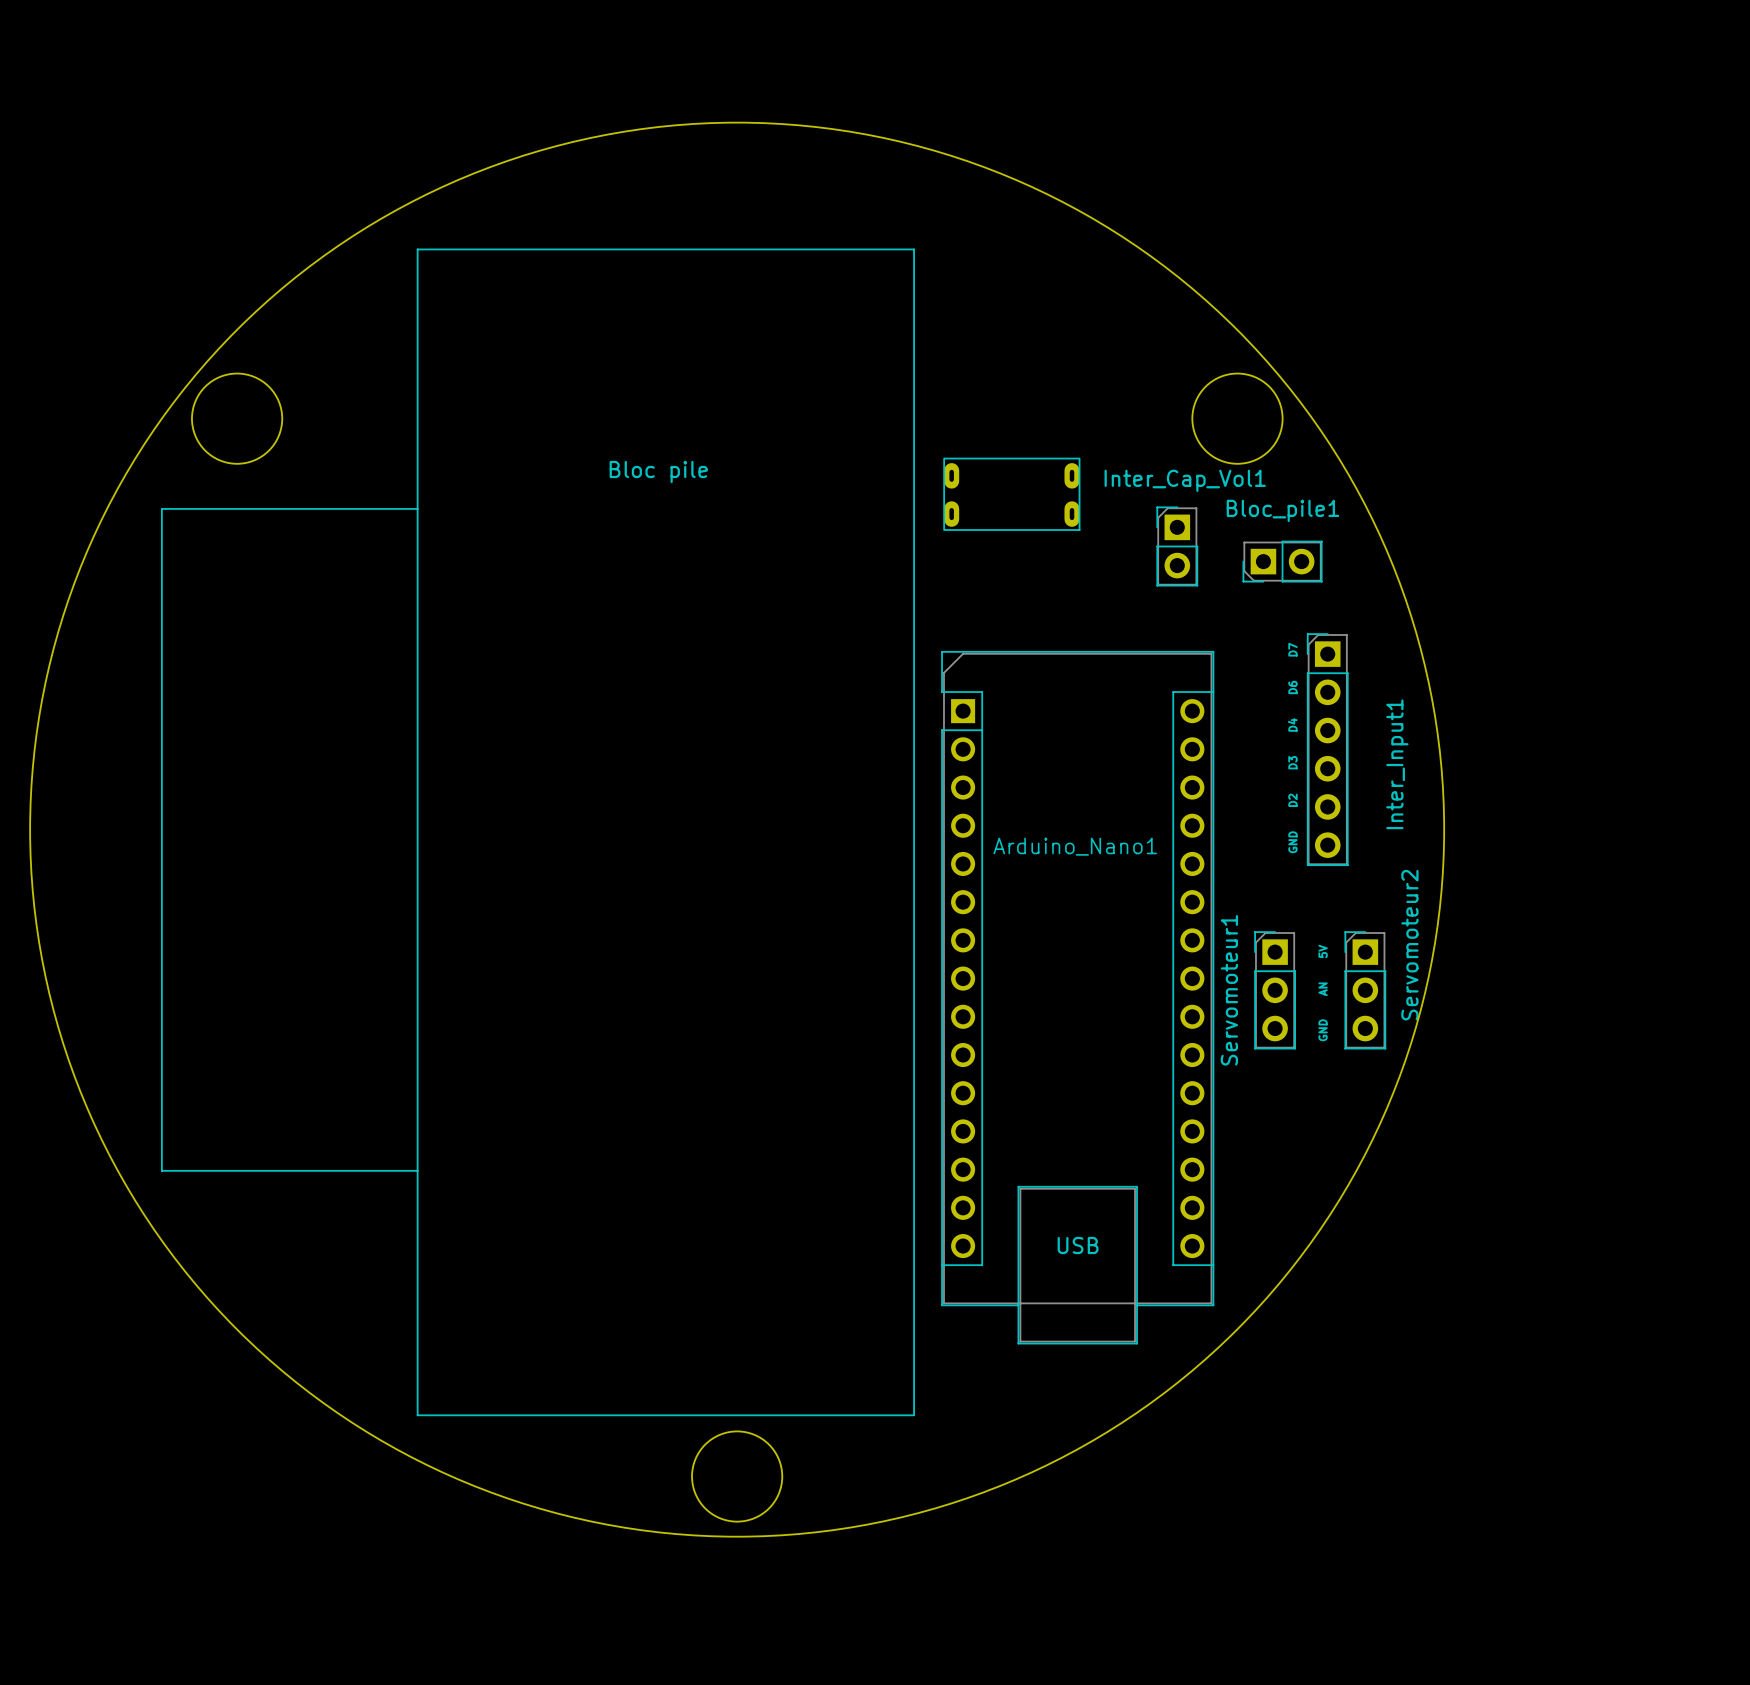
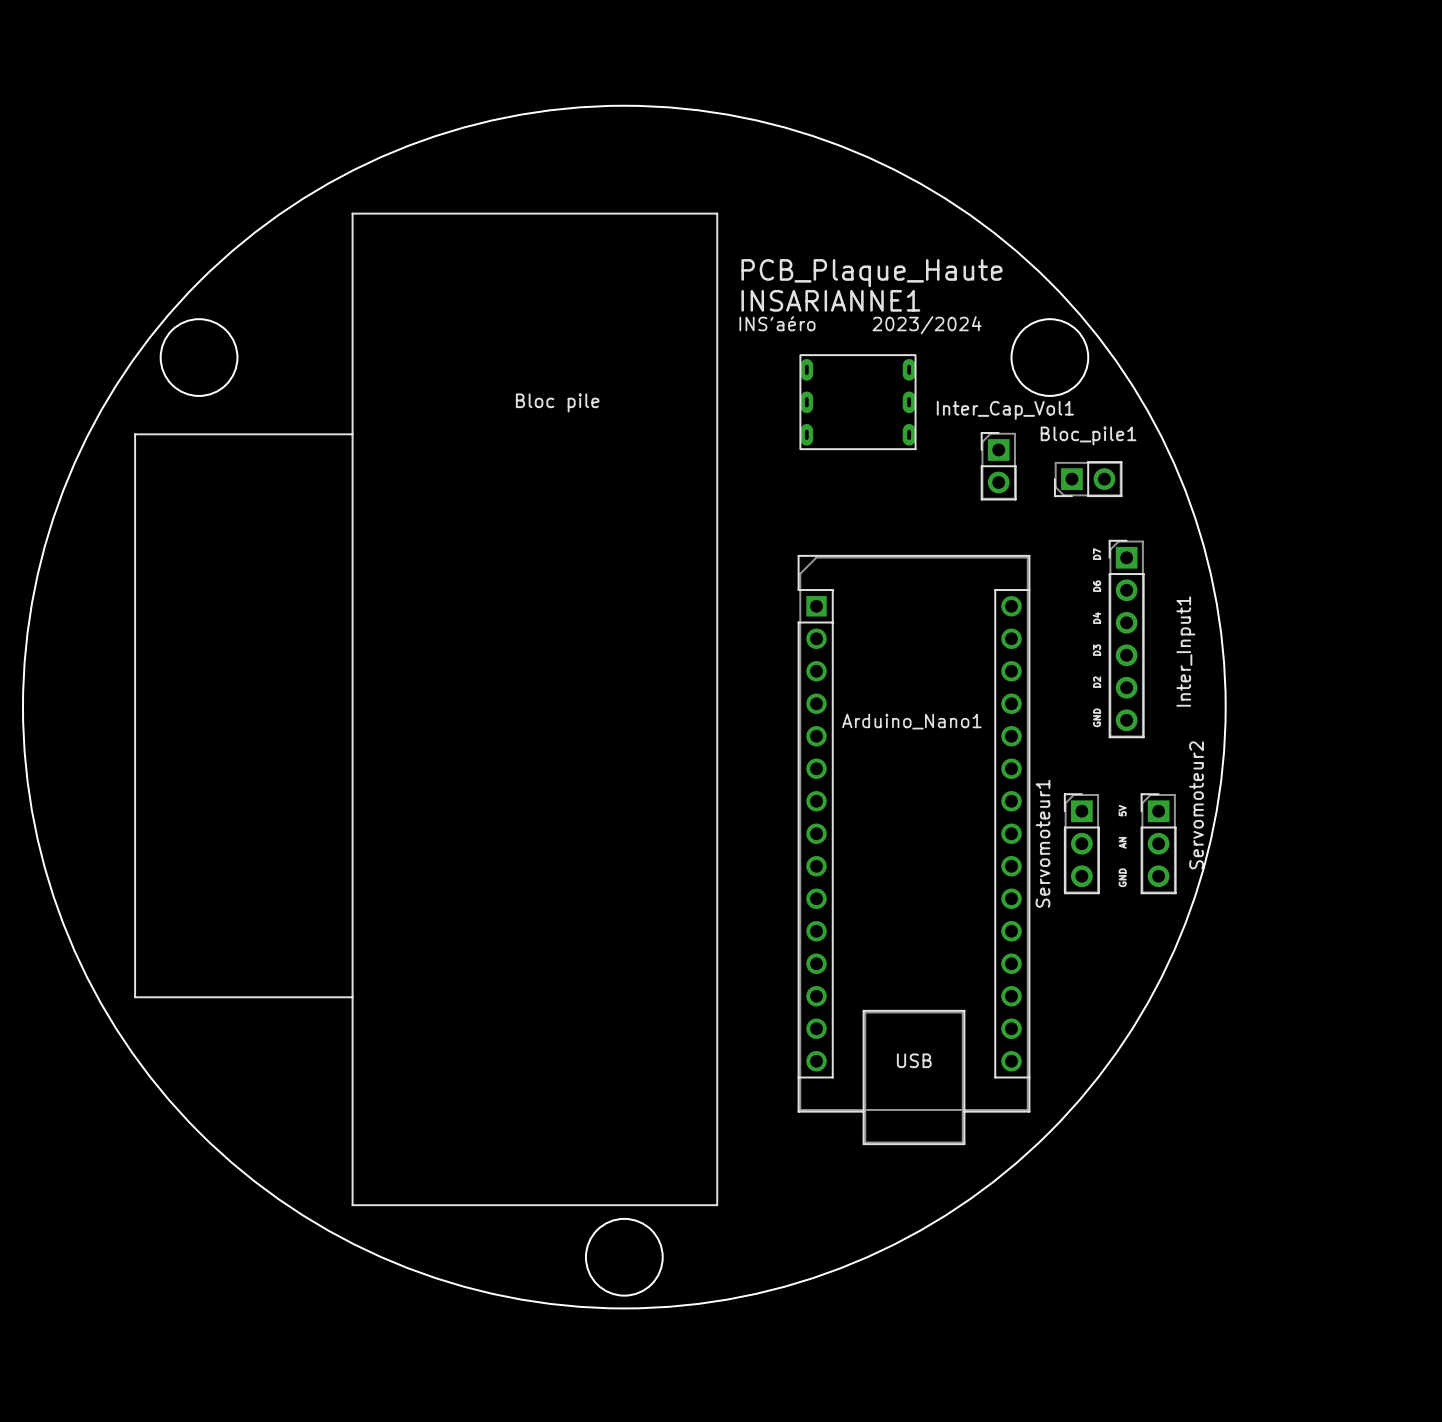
line: (846, 249) (914, 249) (914, 1415) (846, 1415) -> (717, 213) (717, 1205)
text: none -> PCB_Plaque_Haute (871, 273)
text: none -> INSARIANNE1 (830, 300)
text: none -> INS'aéro (777, 323)
text: none -> 2023/2024 (927, 325)
part: none -> (857, 402)
part: (1011, 494) -> none

